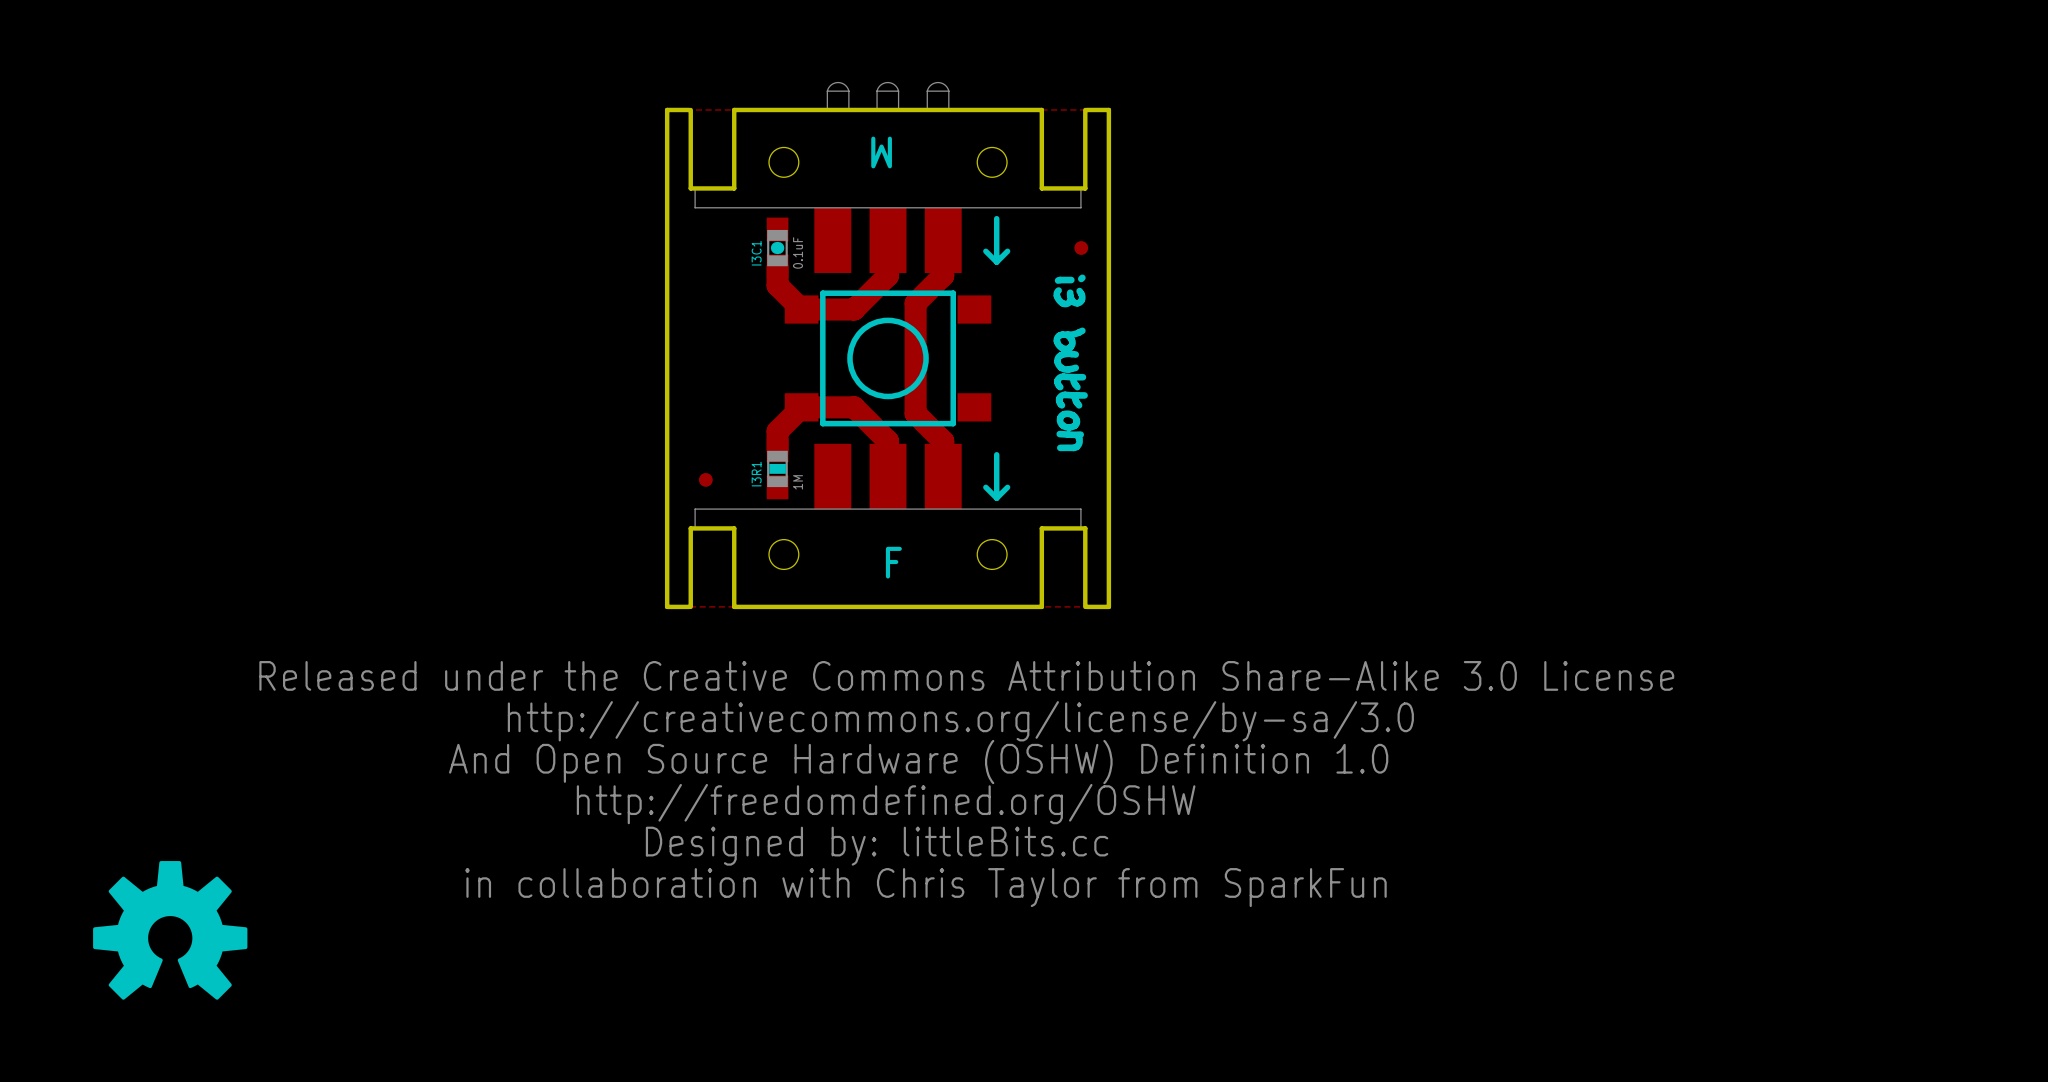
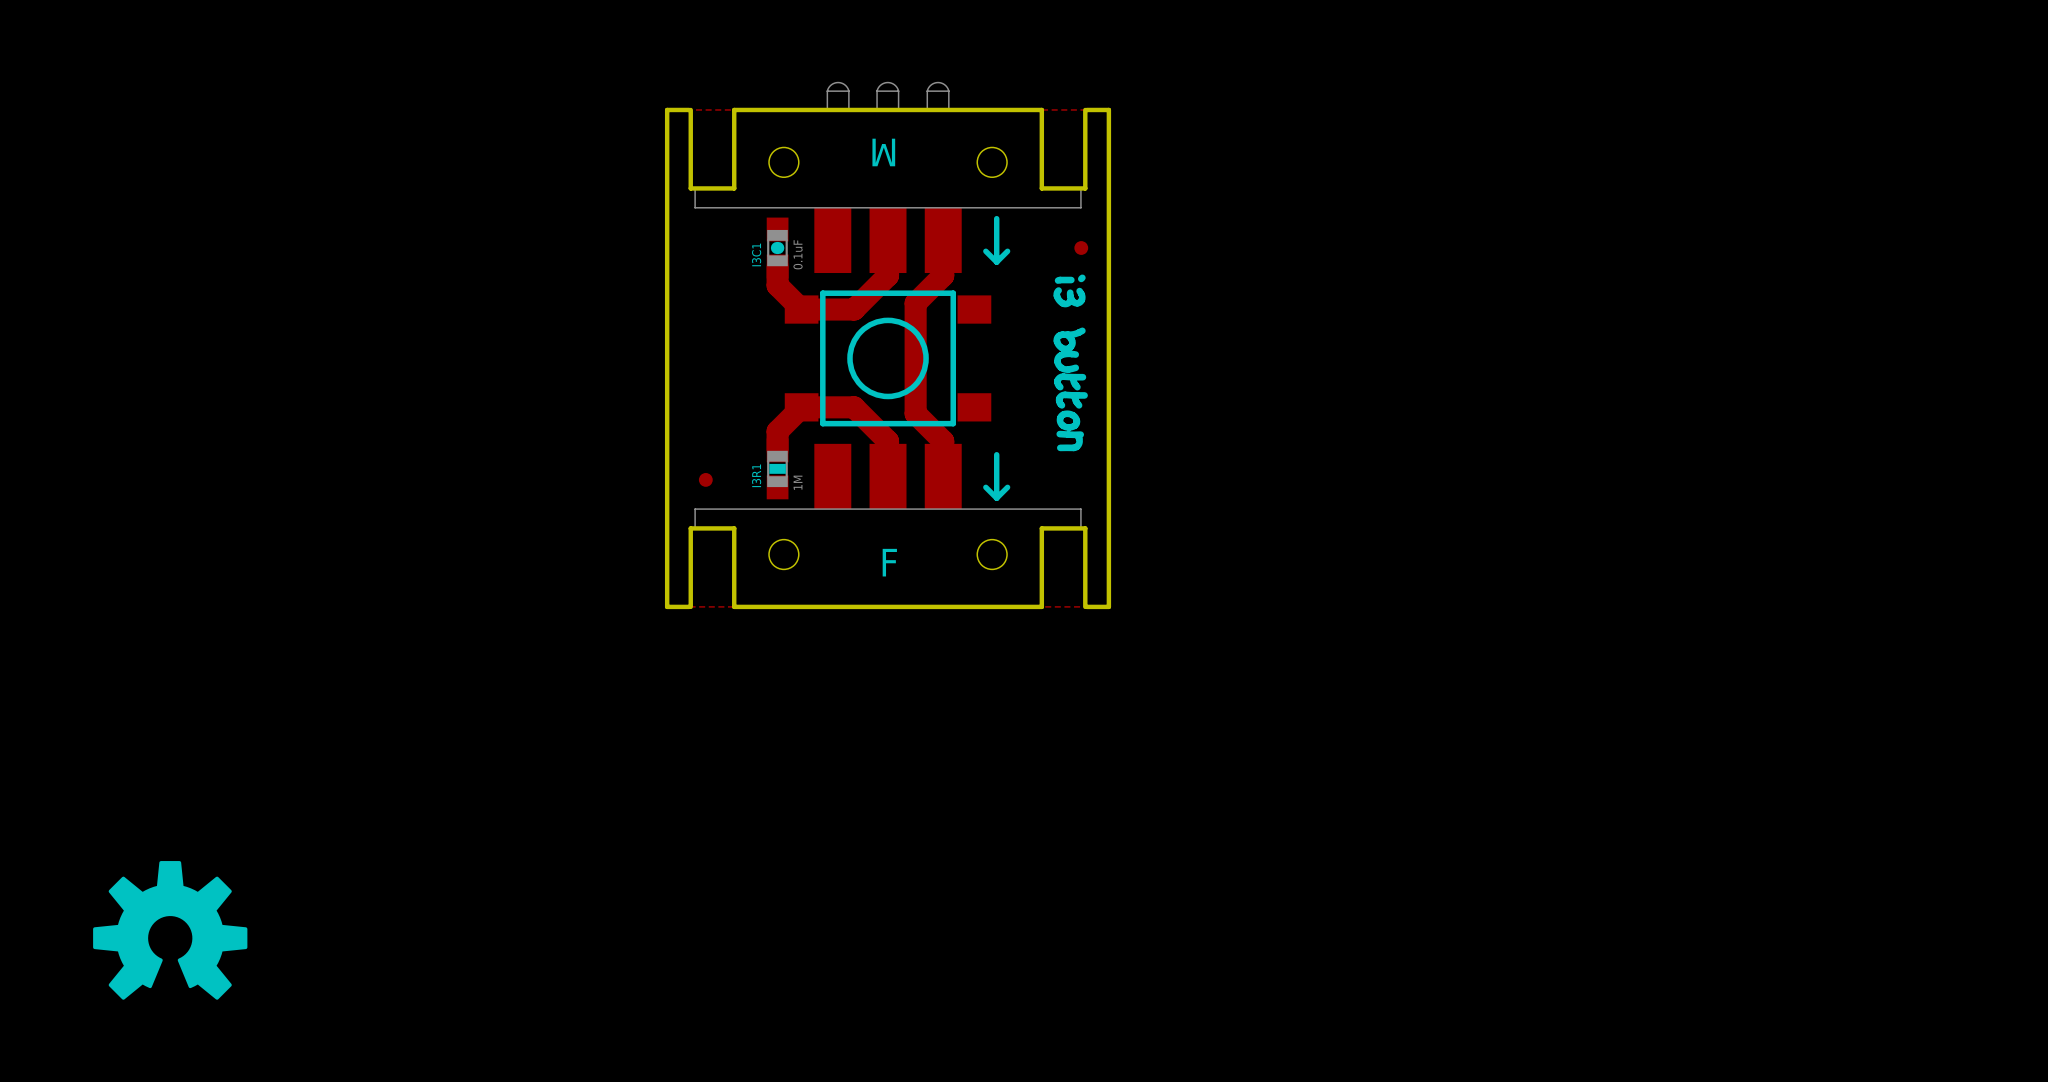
drawing: [259, 661, 1675, 908] -> none

